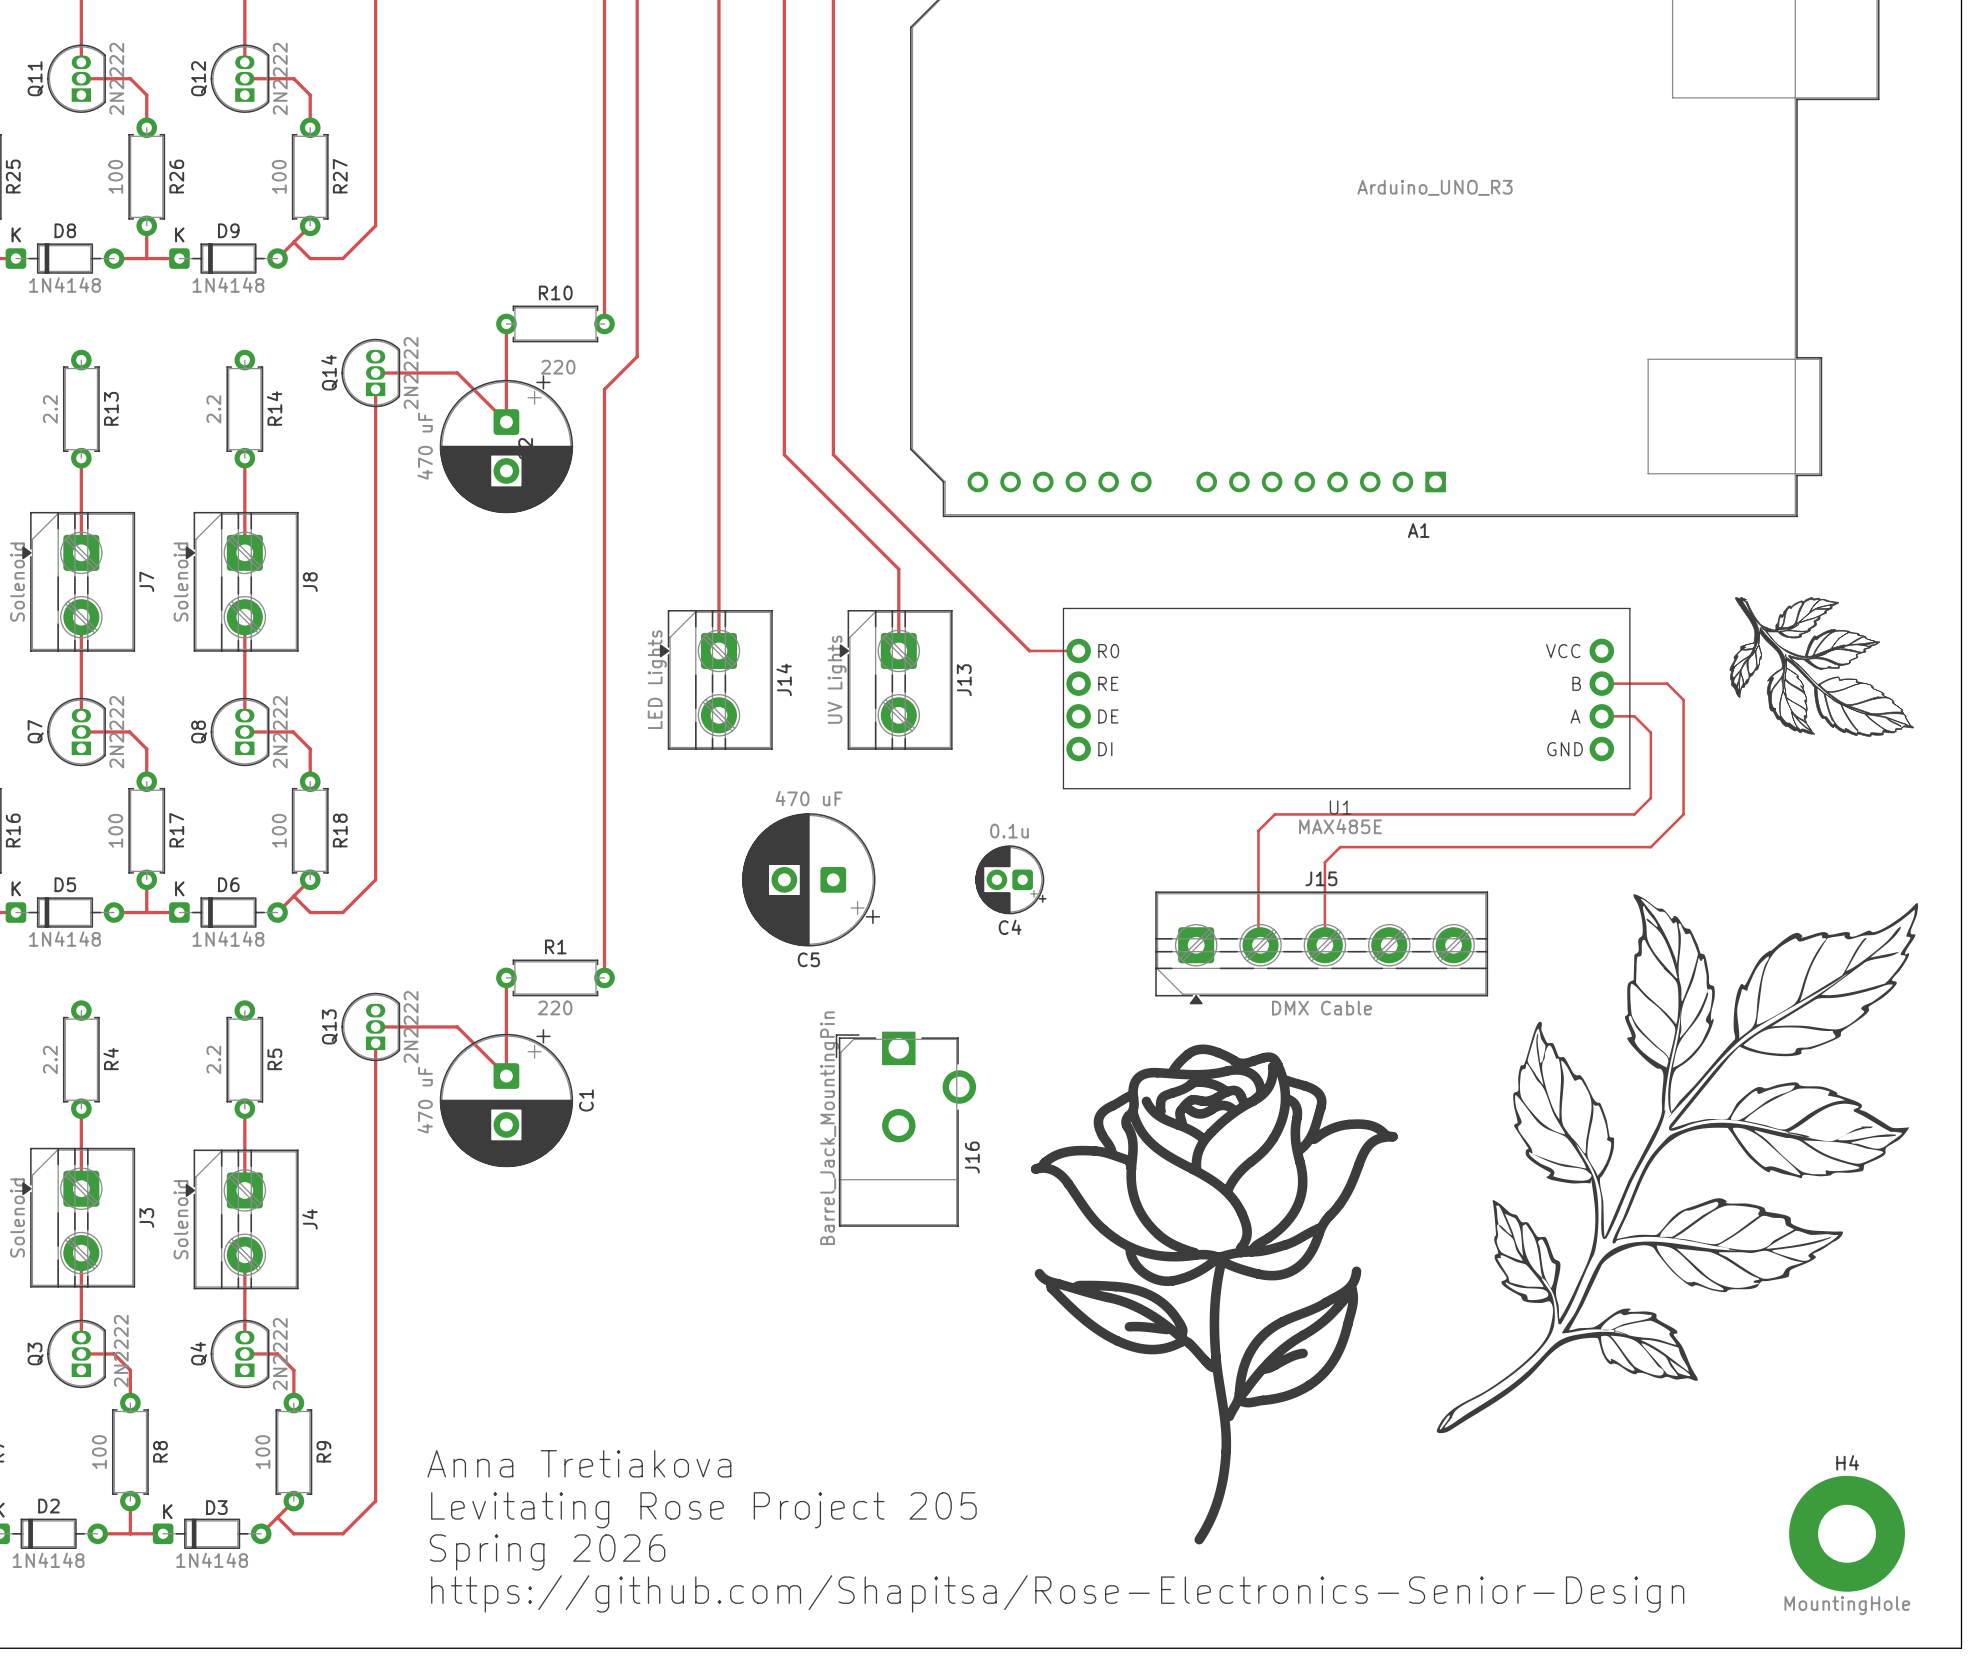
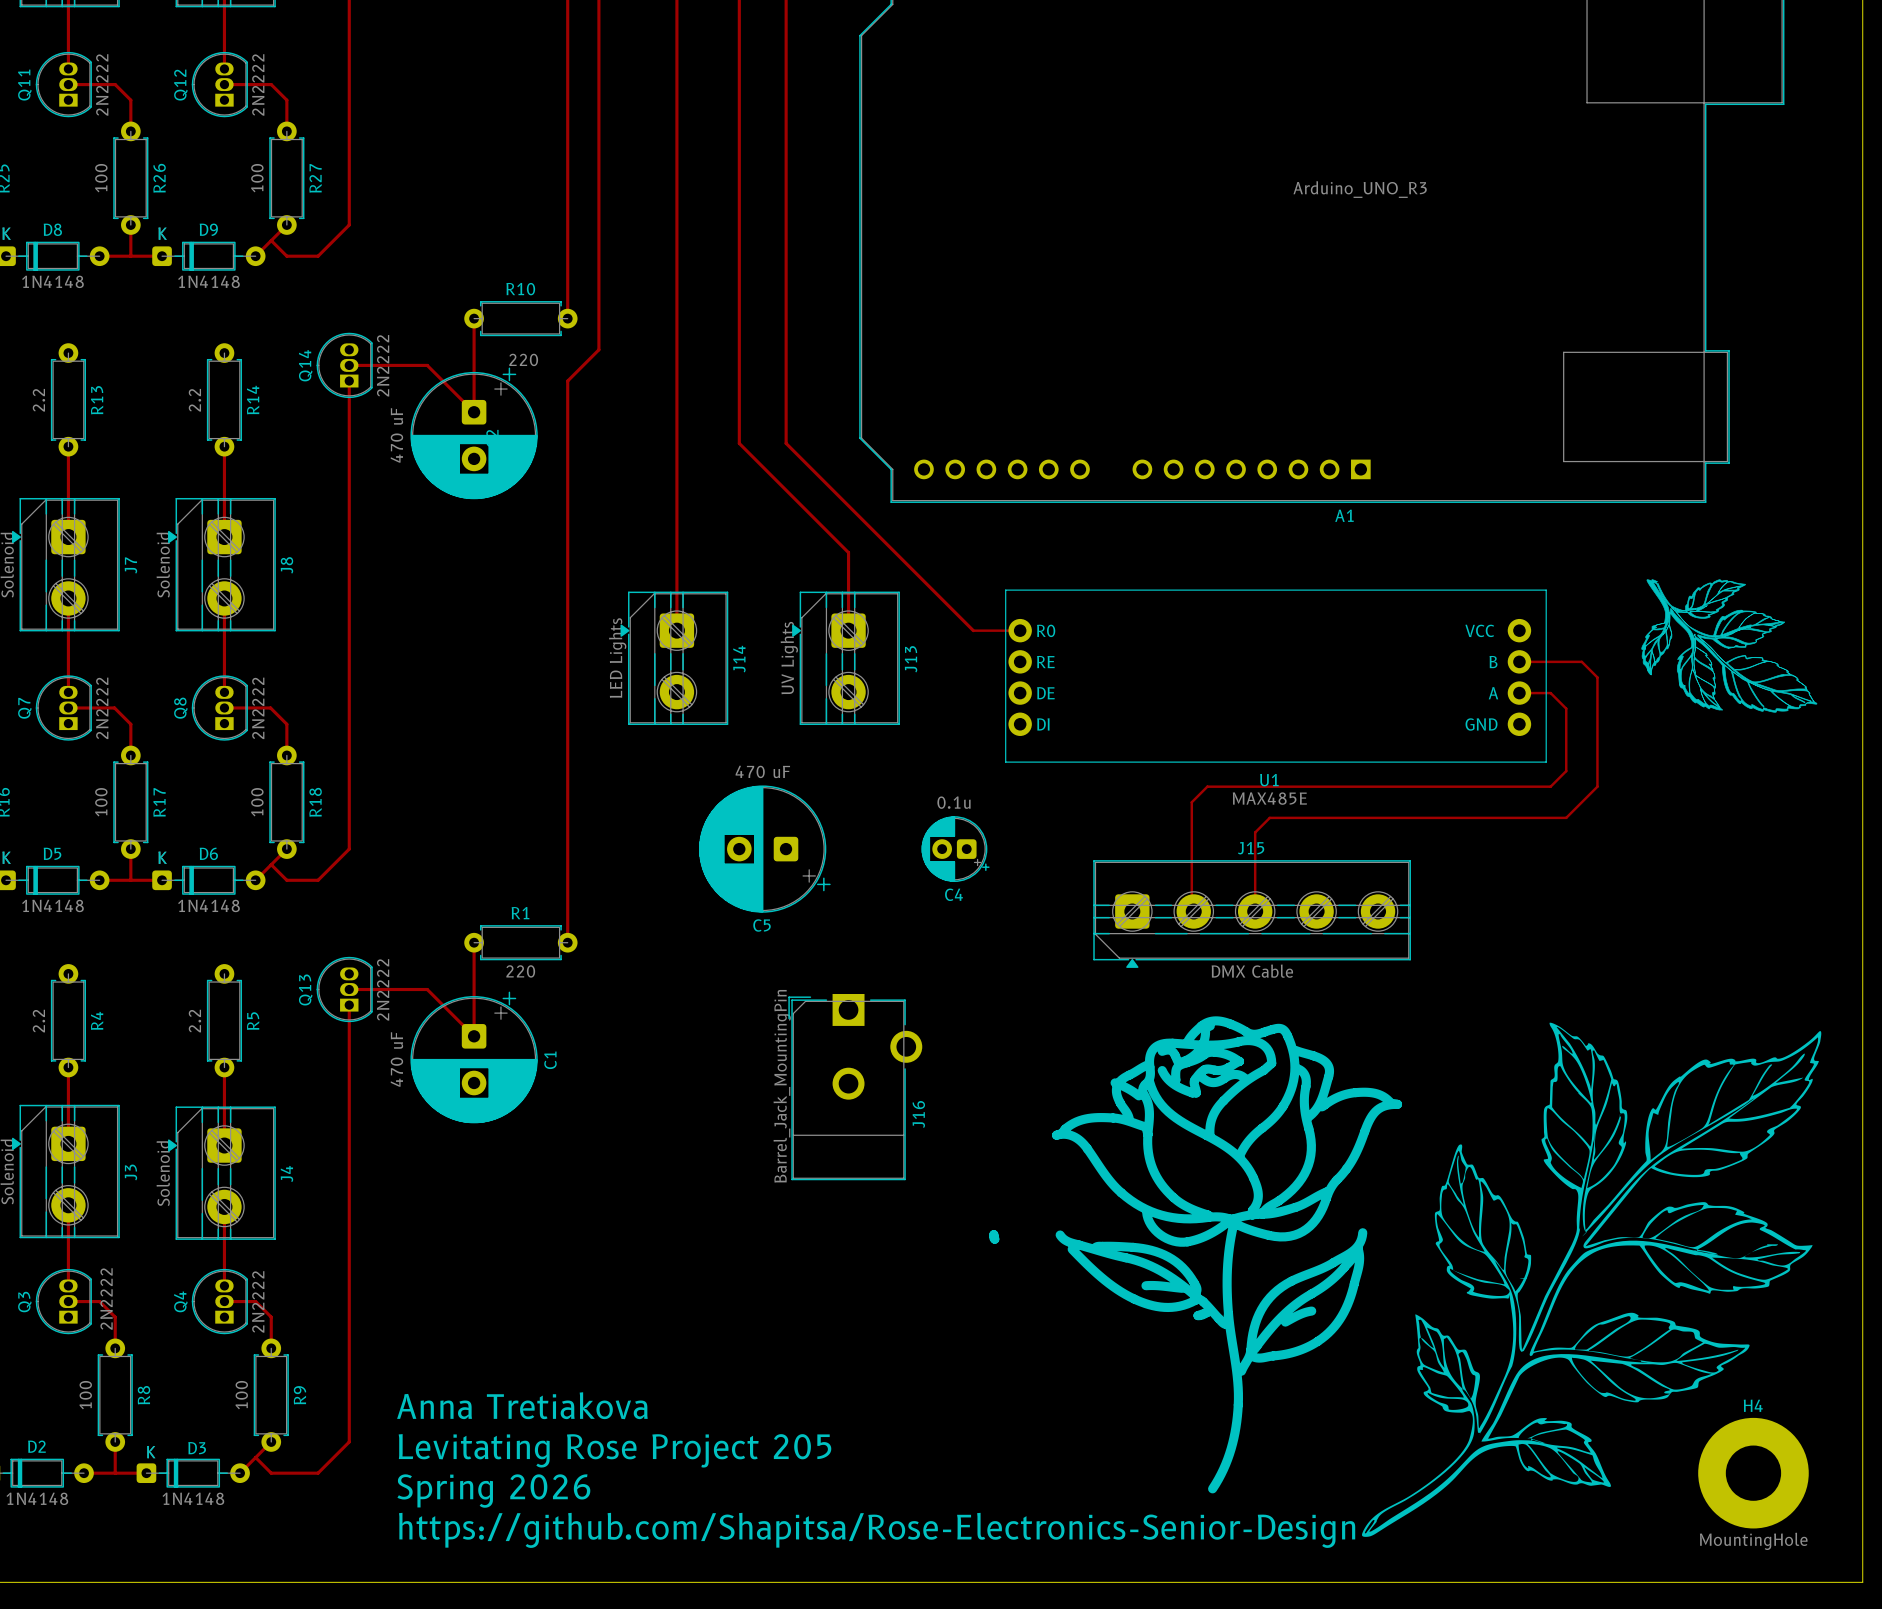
line: (1172, 1072) (1187, 1054) (1200, 1049) (1216, 1051) (1240, 1063) (1268, 1057) (1273, 1058) (1277, 1063) (1285, 1093) (1284, 1107) (1280, 1125) (1268, 1145) (1239, 1172) (1227, 1191) -> (1186, 1043) (1201, 1026) (1213, 1020) (1228, 1023) (1251, 1034) (1278, 1028) (1283, 1029) (1287, 1034) (1294, 1062) (1294, 1076) (1289, 1093) (1278, 1112) (1250, 1138) (1239, 1156)
line: (1286, 1080) (1313, 1089) (1319, 1094) (1321, 1100) (1312, 1134) (1305, 1144) (1298, 1151) -> (1295, 1050) (1321, 1059) (1327, 1063) (1329, 1069) (1320, 1101) (1307, 1117)
line: (1131, 1095) (1105, 1110) (1099, 1118) (1100, 1130) (1112, 1152) -> (1147, 1065) (1122, 1078) (1117, 1086) (1118, 1098) (1129, 1119)
line: (1287, 1099) (1294, 1103) (1297, 1111) (1295, 1140) (1302, 1179) (1299, 1200) (1292, 1214) (1278, 1230) (1252, 1250) (1241, 1252) (1240, 1248) (1246, 1237) (1246, 1228) (1242, 1214) (1233, 1199) (1211, 1180) (1169, 1156) (1152, 1144) (1139, 1128) (1133, 1112) -> (1297, 1068) (1303, 1072) (1306, 1080) (1304, 1108) (1311, 1145) (1308, 1165) (1301, 1178) (1287, 1193) (1263, 1212) (1252, 1214) (1252, 1210) (1257, 1200) (1258, 1192) (1253, 1178) (1244, 1163) (1224, 1145) (1184, 1123) (1168, 1111) (1155, 1096) (1149, 1081)
line: (1146, 1101) (1159, 1116) (1182, 1124) (1180, 1112) (1189, 1101) (1209, 1100) (1227, 1091) (1210, 1083) (1193, 1082) (1163, 1096) (1160, 1101) (1159, 1114) -> (1162, 1070) (1175, 1085) (1196, 1092) (1194, 1080) (1203, 1070) (1222, 1069) (1239, 1061) (1223, 1053) (1207, 1053) (1178, 1066) (1174, 1083)
line: (1187, 1108) (1199, 1113) (1221, 1105) (1228, 1106) (1234, 1110) -> (1201, 1077) (1212, 1082) (1233, 1074) (1240, 1075) (1246, 1079)
drawing position: (1858, 1130) -> (1764, 1248)
drawing position: (1798, 1134) -> (1707, 1252)
line: (1311, 1138) (1314, 1139) (1336, 1127) (1356, 1124) (1373, 1126) (1386, 1135) (1393, 1136) (1378, 1138) (1368, 1146) (1346, 1192) (1325, 1221) (1318, 1235) -> (1320, 1105) (1322, 1106) (1343, 1095) (1362, 1092) (1379, 1094) (1391, 1103) (1397, 1104) (1383, 1106) (1373, 1113) (1353, 1157) (1332, 1184) (1326, 1198)
drawing position: (1677, 1163) -> (1591, 1279)
line: (1131, 1168) (1129, 1160) (1101, 1151) (1081, 1150) (1056, 1155) (1045, 1162) (1042, 1166) (1035, 1169) (1046, 1168) (1059, 1173) (1090, 1216) (1103, 1229) (1123, 1243) (1151, 1254) (1175, 1256) (1204, 1254) (1221, 1256) (1275, 1247) (1292, 1242) (1319, 1228) (1318, 1235) -> (1147, 1134) (1145, 1127) (1119, 1118) (1100, 1117) (1076, 1121) (1065, 1128) (1063, 1132) (1056, 1135) (1067, 1134) (1078, 1139) (1109, 1180) (1121, 1192) (1140, 1206) (1167, 1216) (1189, 1218) (1217, 1216) (1233, 1219) (1285, 1210) (1301, 1204) (1327, 1191) (1326, 1198)
line: (1131, 1168) (1132, 1141) (1126, 1121) (1133, 1108) (1133, 1086) (1139, 1076) (1154, 1072) (1200, 1074) (1235, 1069) (1249, 1072) (1257, 1080) (1261, 1093) (1227, 1117) (1207, 1136) (1198, 1151) (1196, 1168) -> (1147, 1134) (1149, 1108) (1142, 1090) (1149, 1077) (1150, 1055) (1155, 1047) (1169, 1043) (1213, 1045) (1247, 1040) (1260, 1043) (1268, 1050) (1271, 1063) (1239, 1085) (1220, 1104) (1212, 1118) (1209, 1134)
line: (1131, 1168) (1133, 1196) (1145, 1220) (1164, 1239) (1195, 1254) -> (1147, 1134) (1150, 1161) (1161, 1184) (1179, 1202) (1209, 1217)
line: (1318, 1235) (1310, 1253) (1301, 1264) (1289, 1272) (1275, 1275) (1247, 1271) (1217, 1258) (1188, 1276) (1172, 1280) (1161, 1280) (1151, 1277) (1139, 1268) (1132, 1259) (1130, 1249) -> (1326, 1198) (1318, 1215) (1310, 1226) (1298, 1233) (1285, 1236) (1258, 1232) (1229, 1220) (1202, 1237) (1187, 1241) (1176, 1241) (1166, 1238) (1155, 1230) (1149, 1221) (1146, 1211)
line: (1221, 1263) (1214, 1309) (1215, 1356) -> (1233, 1225) (1227, 1269) (1228, 1313)
line: (1356, 1271) (1352, 1283) (1343, 1292) (1318, 1306) (1281, 1322) (1259, 1339) (1245, 1361) (1238, 1398) (1229, 1416) -> (1362, 1232) (1359, 1244) (1349, 1253) (1325, 1266) (1291, 1281) (1270, 1297) (1257, 1318) (1250, 1354) (1241, 1371)
line: (1039, 1273) (1049, 1281) (1134, 1306) (1158, 1319) (1183, 1340) (1180, 1335) (1182, 1328) (1174, 1315) (1164, 1304) (1148, 1294) (1115, 1286) (1080, 1285) (1075, 1287) -> (1060, 1235) (1070, 1242) (1150, 1265) (1173, 1278) (1197, 1298) (1195, 1293) (1196, 1287) (1188, 1274) (1179, 1264) (1164, 1254) (1132, 1247) (1099, 1246) (1094, 1248)
line: (1052, 1288) (1090, 1324) (1120, 1342) (1136, 1347) (1152, 1349) (1164, 1348) (1185, 1341) (1213, 1367) (1215, 1356) -> (1072, 1249) (1108, 1283) (1137, 1300) (1152, 1305) (1168, 1307) (1179, 1306) (1199, 1299) (1226, 1324) (1228, 1313)
line: (1351, 1288) (1347, 1291) (1343, 1300) (1325, 1319) (1290, 1343) (1271, 1359) (1241, 1394) (1240, 1400) (1250, 1402) (1284, 1396) (1304, 1388) (1320, 1376) (1334, 1358) (1343, 1338) (1352, 1304) (1351, 1288) -> (1358, 1249) (1353, 1251) (1350, 1260) (1333, 1278) (1299, 1301) (1281, 1316) (1252, 1350) (1251, 1355) (1261, 1358) (1293, 1352) (1312, 1344) (1328, 1332) (1341, 1316) (1350, 1296) (1359, 1264) (1358, 1249)
line: (1129, 1326) (1167, 1329) -> (1145, 1285) (1182, 1288)
drawing position: (1621, 1332) -> (1537, 1440)
line: (1303, 1353) (1275, 1364) -> (1311, 1311) (1285, 1322)
line: (1215, 1356) (1225, 1427) (1225, 1463) (1216, 1503) (1199, 1539) -> (1228, 1313) (1237, 1382) (1237, 1416) (1229, 1453) (1212, 1488)

